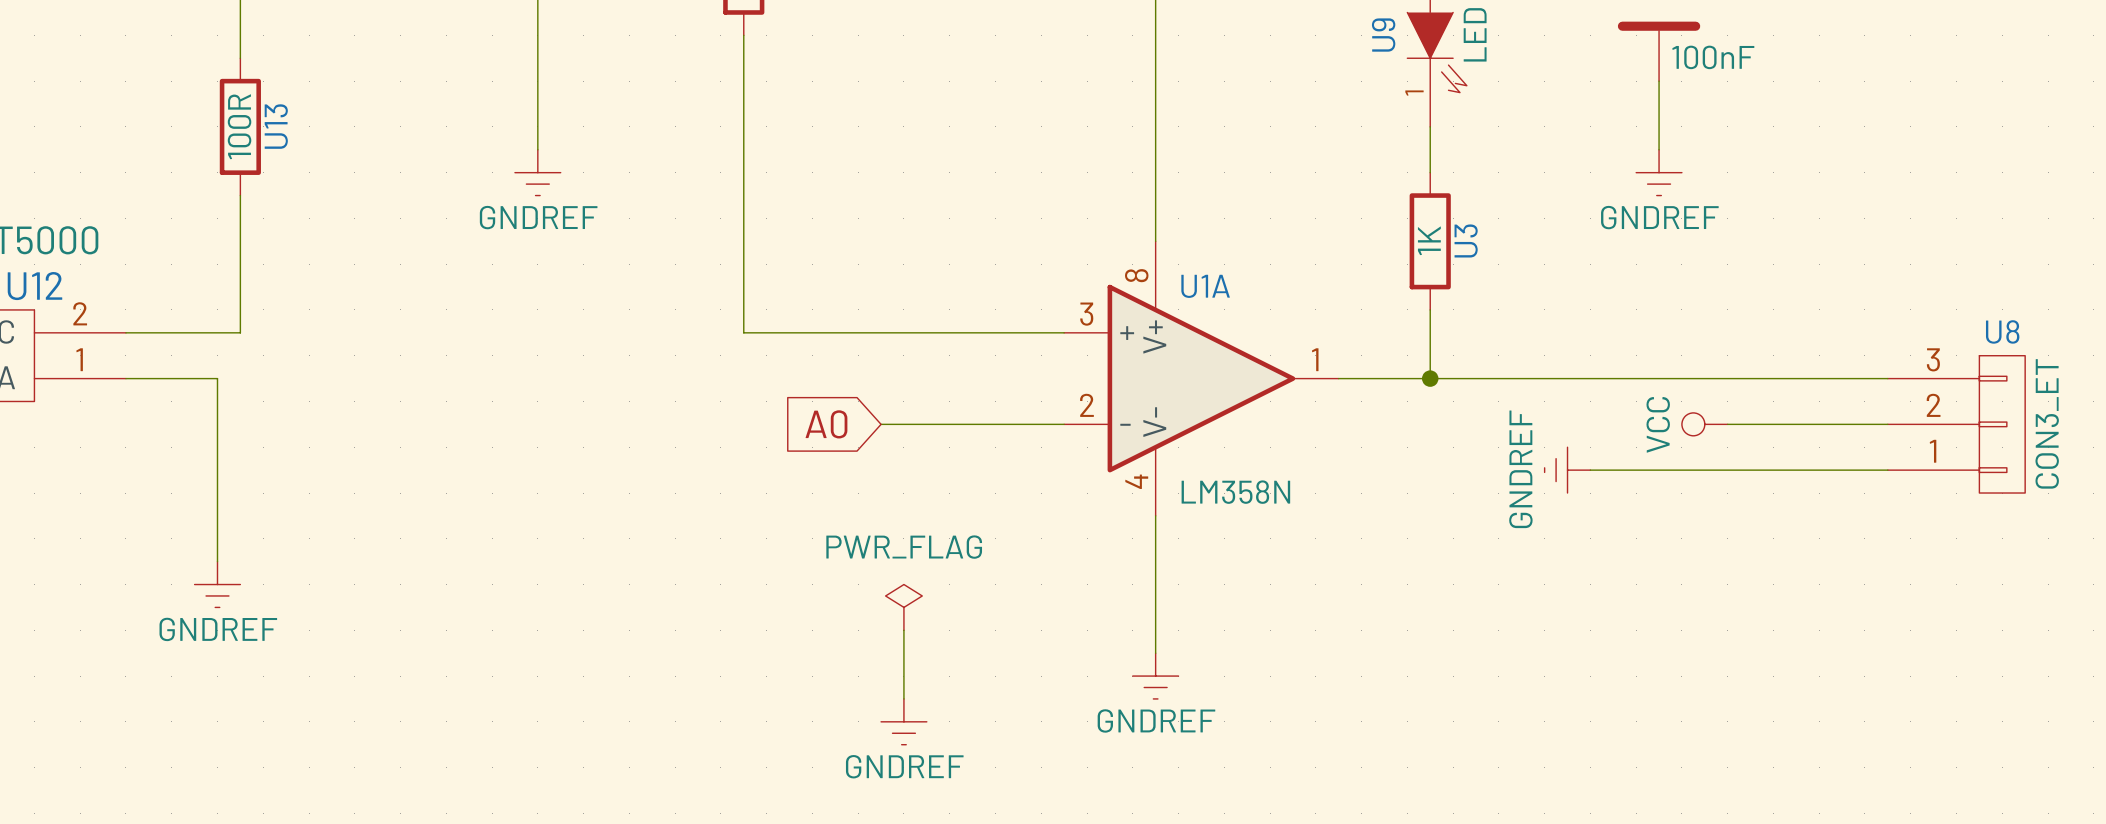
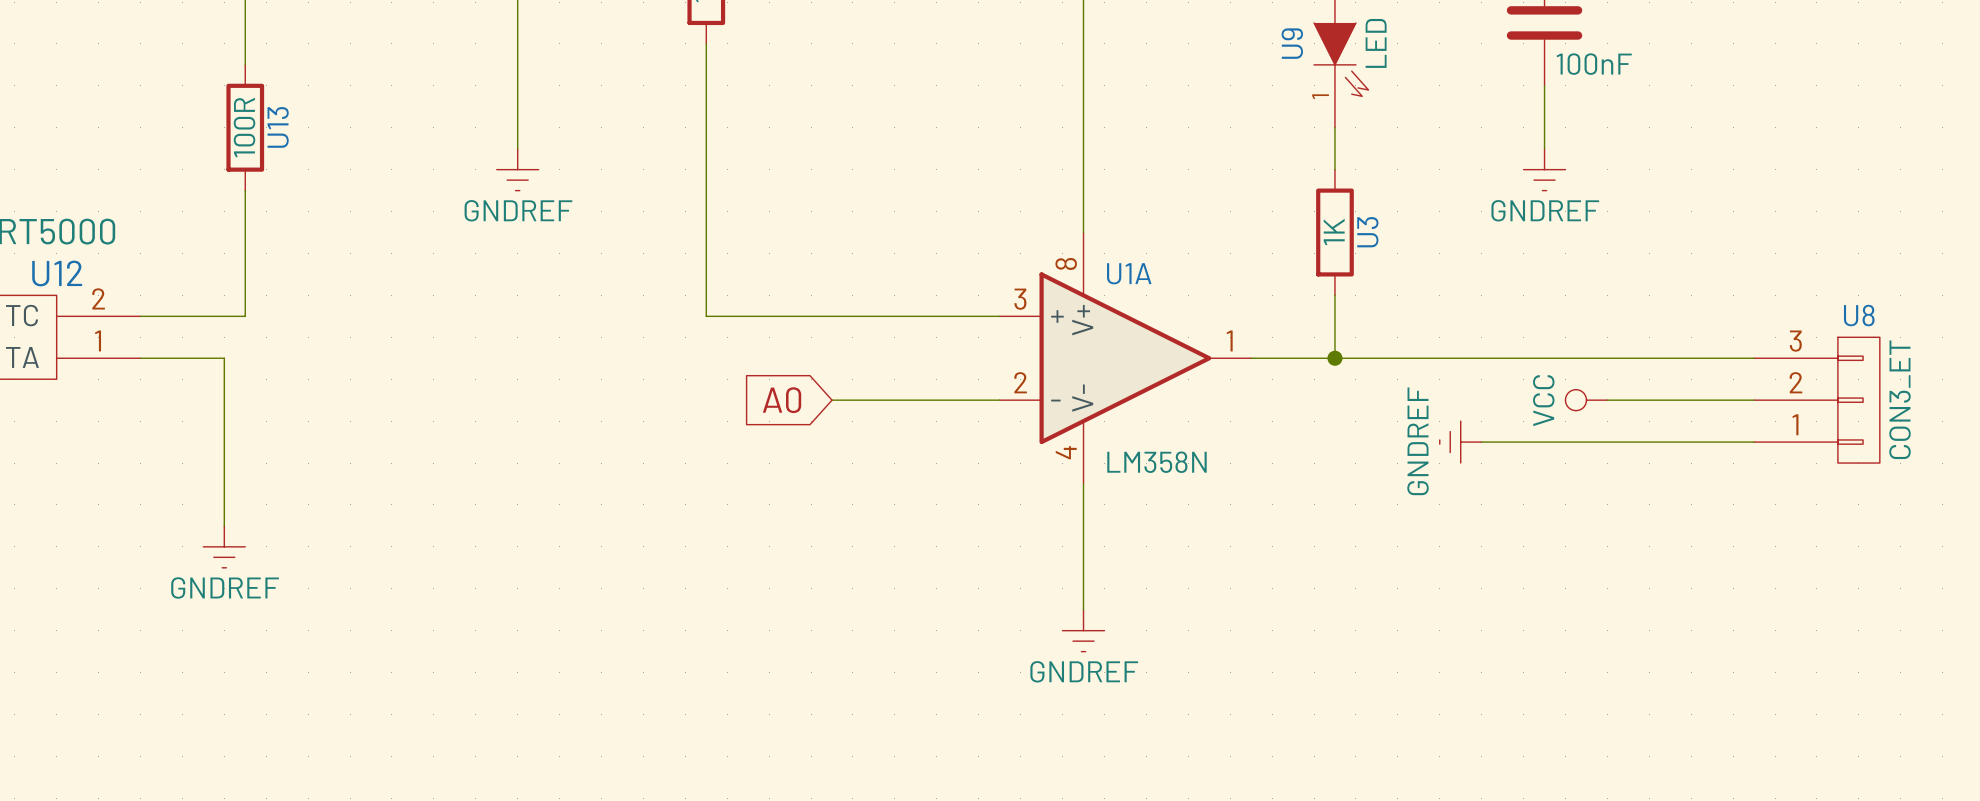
power symbol: PWR_FLAG (903, 607) -> none
wire: (903, 630) (903, 698) -> none
power symbol: GNDREF (903, 721) -> none

